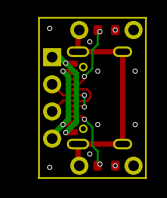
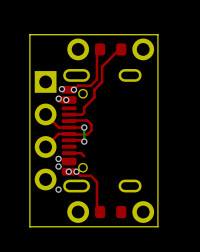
via: (49, 28) -> none
top track: (79, 30) (77, 51) (122, 51) (122, 144) (77, 144) (79, 165) -> none
via: (115, 30) -> none
top track: none -> (100, 51) (96, 54) (96, 79) (90, 85) (78, 85) (73, 89)
bottom track: (99, 31) (97, 33) (97, 44) (92, 49) (92, 68) (84, 76) -> none
via: (99, 31) -> none
via: (89, 41) -> none
bottom track: (52, 57) (59, 57) (76, 73) (76, 121) (65, 132) -> none
via: none -> (73, 89)
bottom track: (63, 71) (68, 76) (68, 119) (52, 135) (52, 138) -> none
via: (97, 71) -> none
via: (135, 71) -> none
via: none -> (66, 99)
top track: (84, 76) (78, 84) -> (121, 51) (117, 51) (102, 66) (102, 82) (94, 89) (94, 97) (84, 107) (84, 112) (77, 114)
via: (84, 76) -> none
bottom track: (84, 119) (92, 127) (92, 145) (97, 151) (97, 161) (99, 164) -> none
via: (84, 119) -> none
via: none -> (58, 158)
via: (63, 124) -> none
via: (97, 124) -> none
via: (135, 124) -> none
via: none -> (58, 166)
via: (65, 132) -> none
via: none -> (68, 171)
top track: none -> (76, 171) (80, 175) (90, 175) (96, 181) (96, 206) (100, 210)
via: none -> (76, 171)
via: none -> (58, 189)
via: (89, 153) -> none
via: (99, 164) -> none
via: (115, 165) -> none
via: (49, 167) -> none

